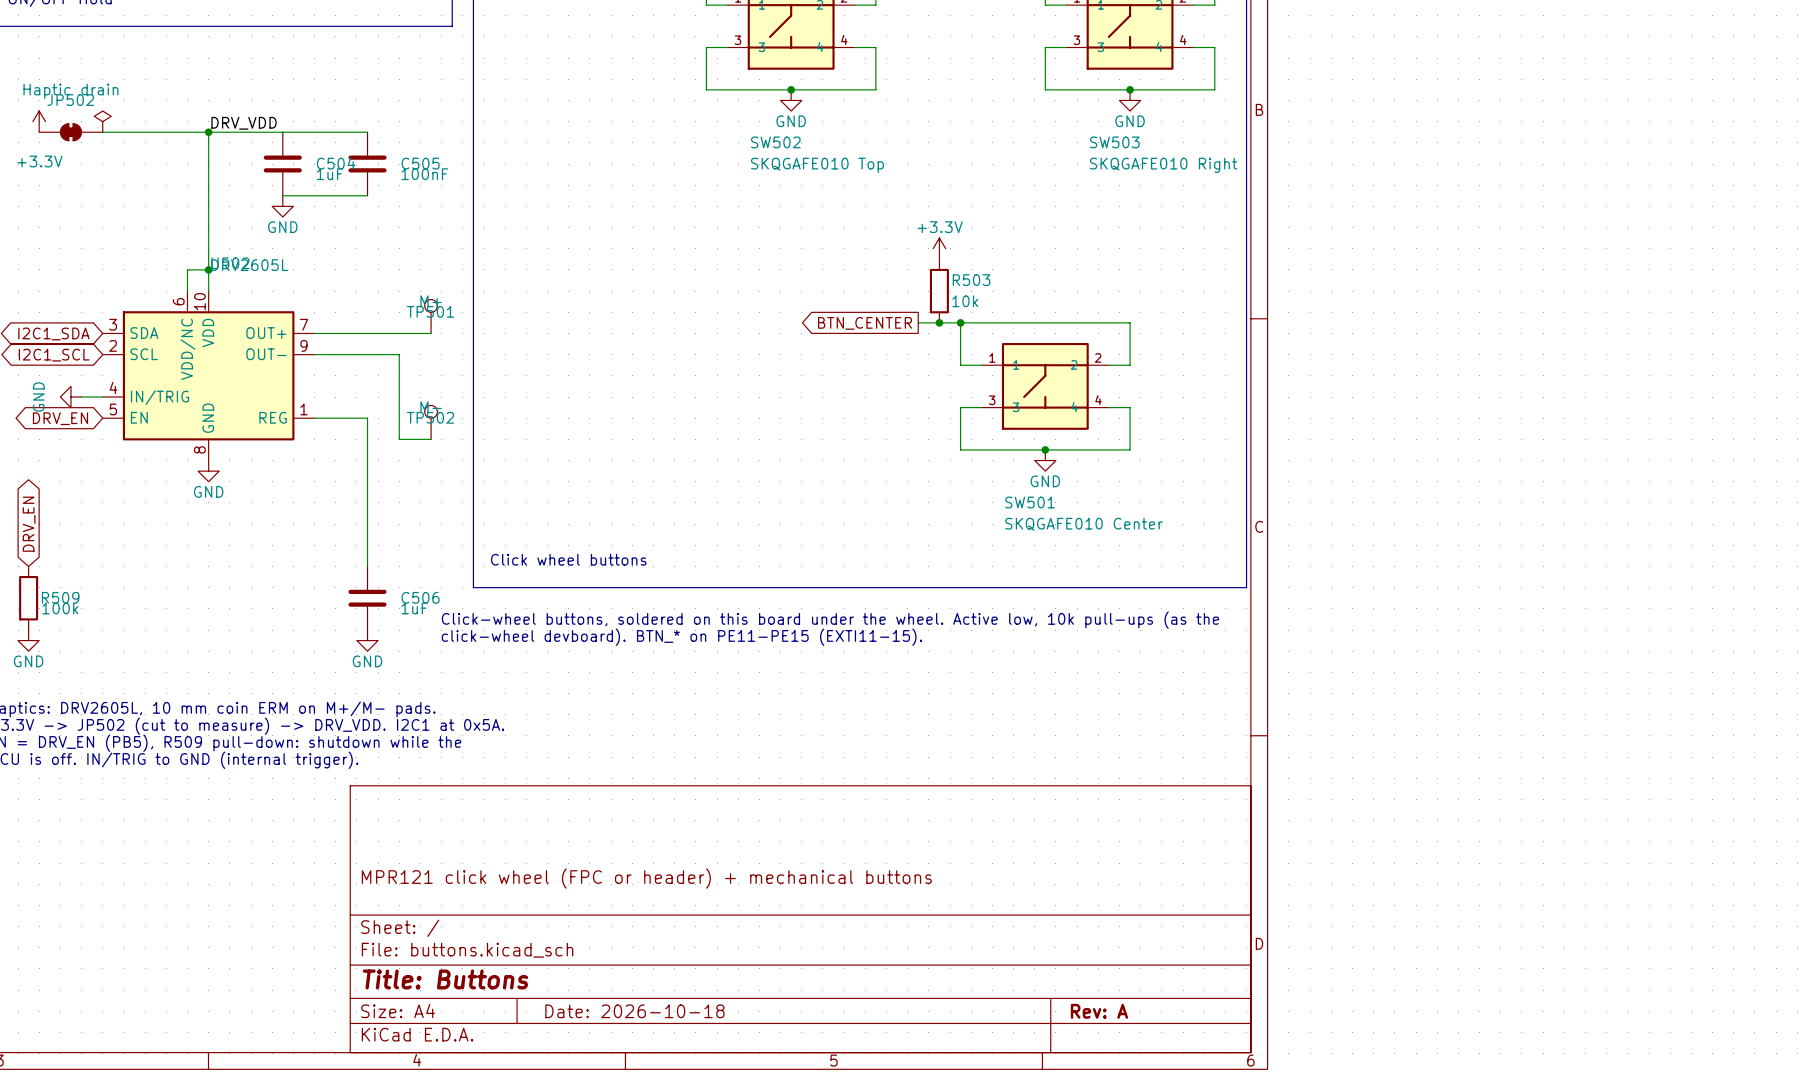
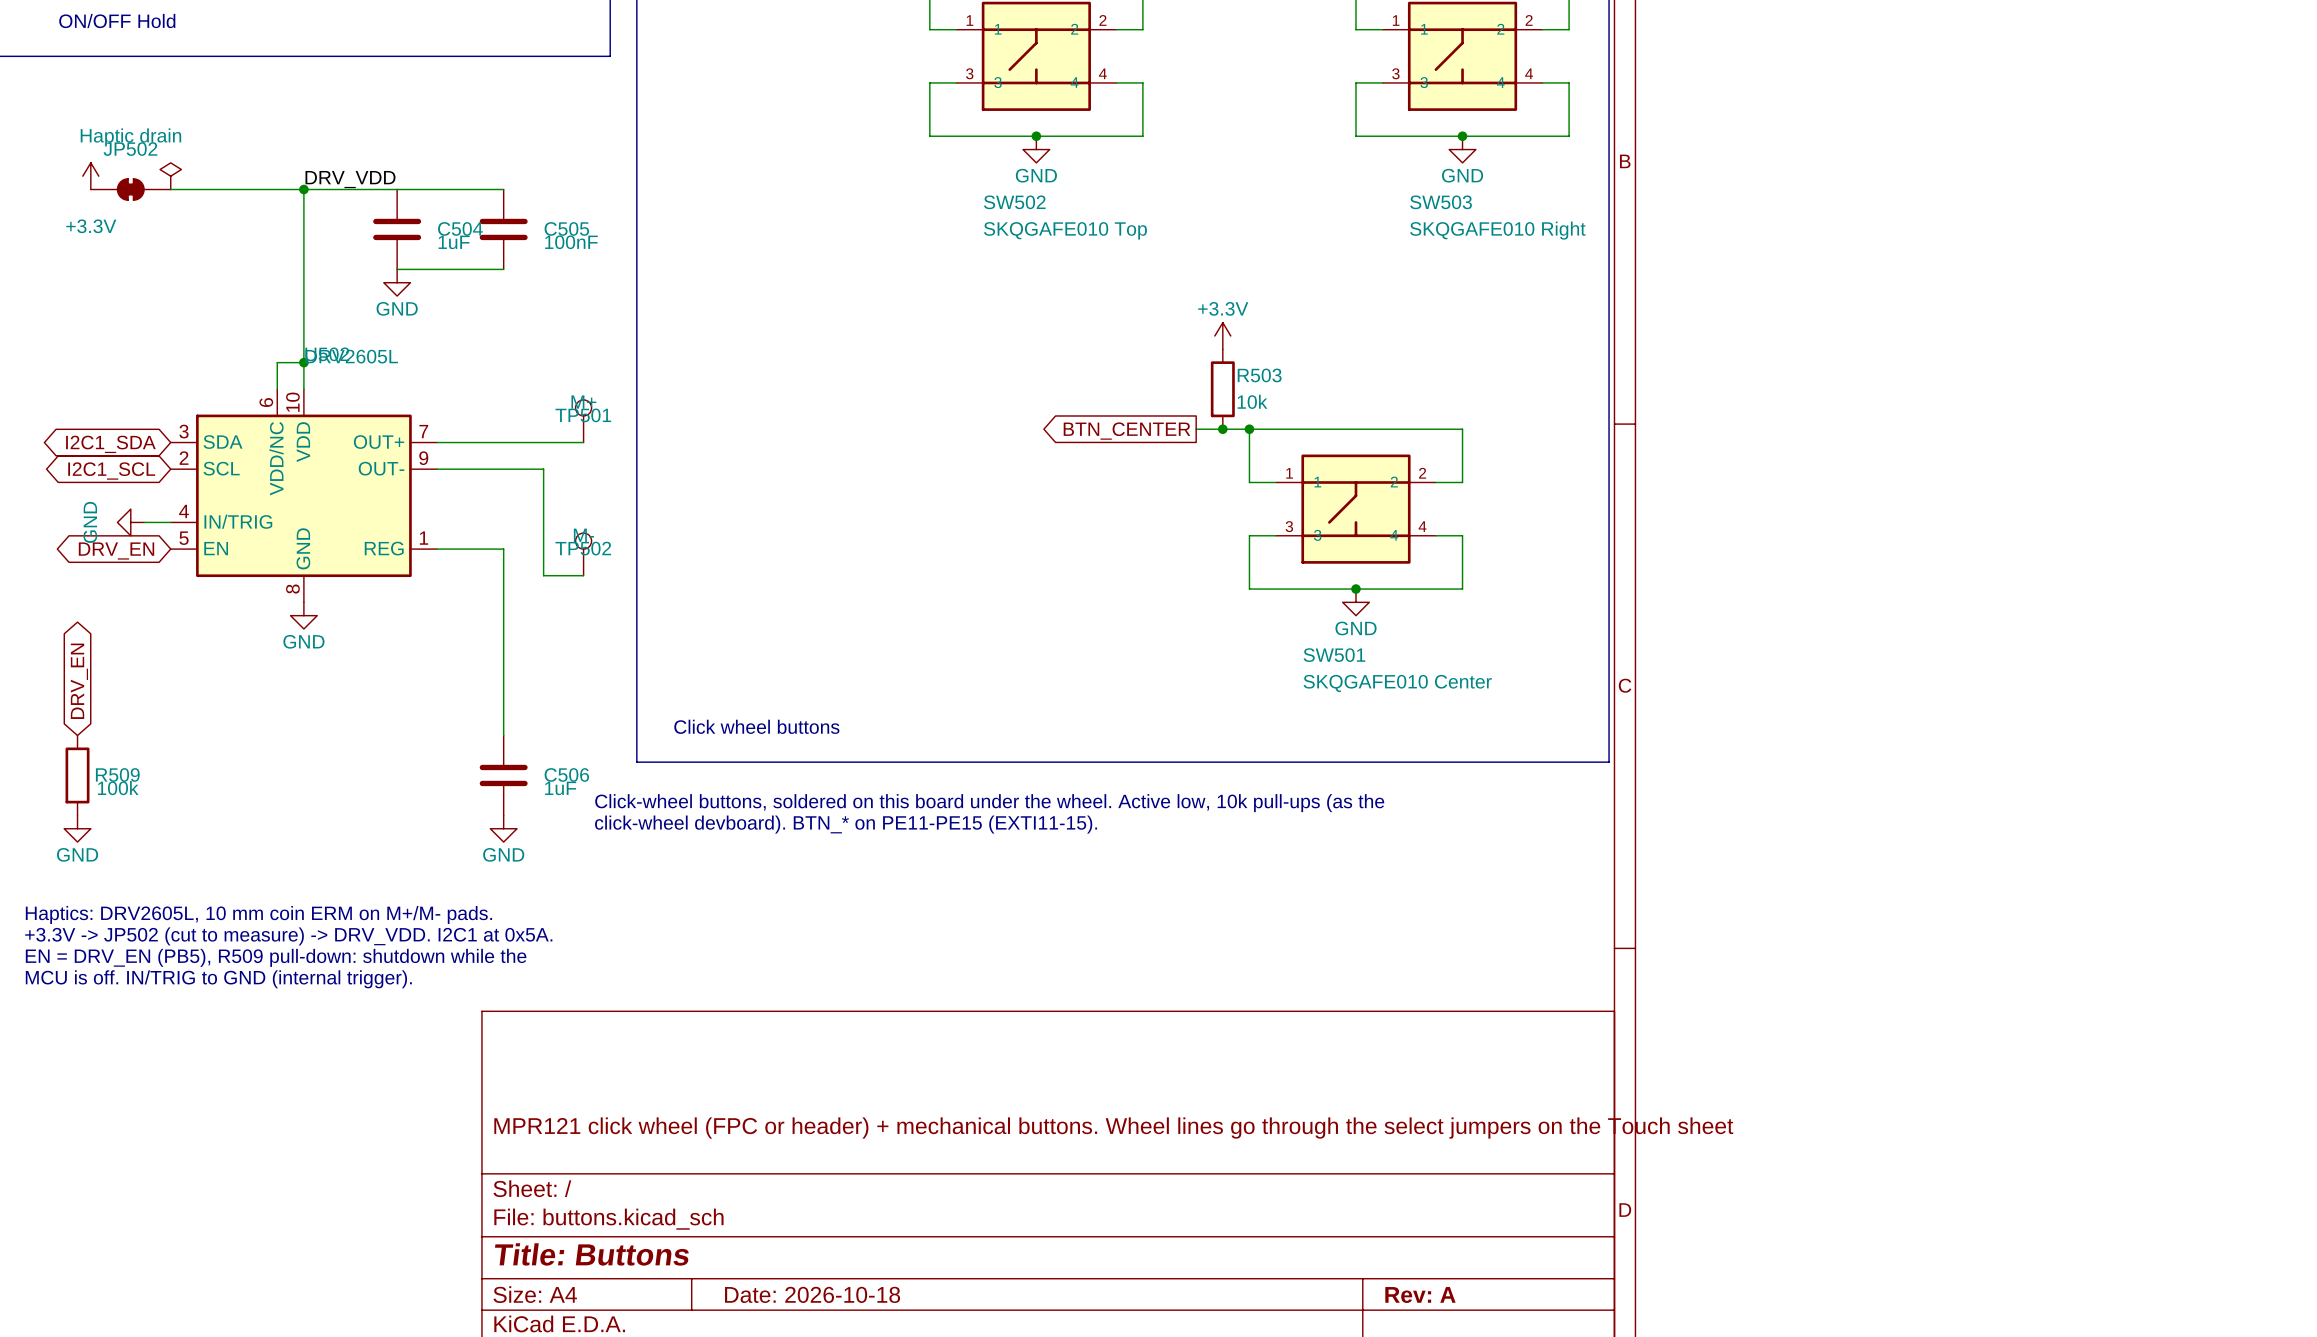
title block: MPR121 click wheel (FPC or header) + mechanical buttons (646, 878) -> MPR121 click wheel (FPC or header) + mechanical buttons. Wheel lines go through the select jumpers on the Touch sheet (1113, 1128)

